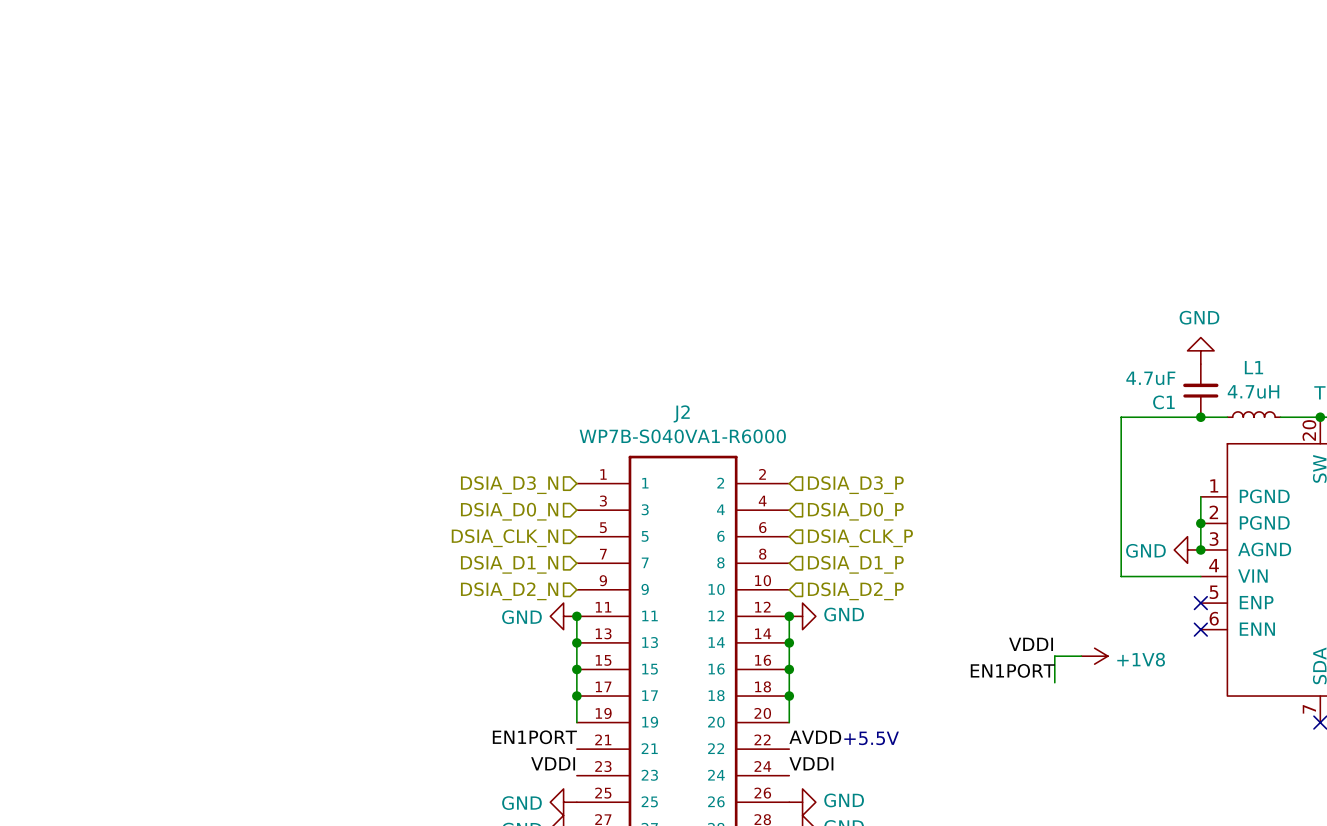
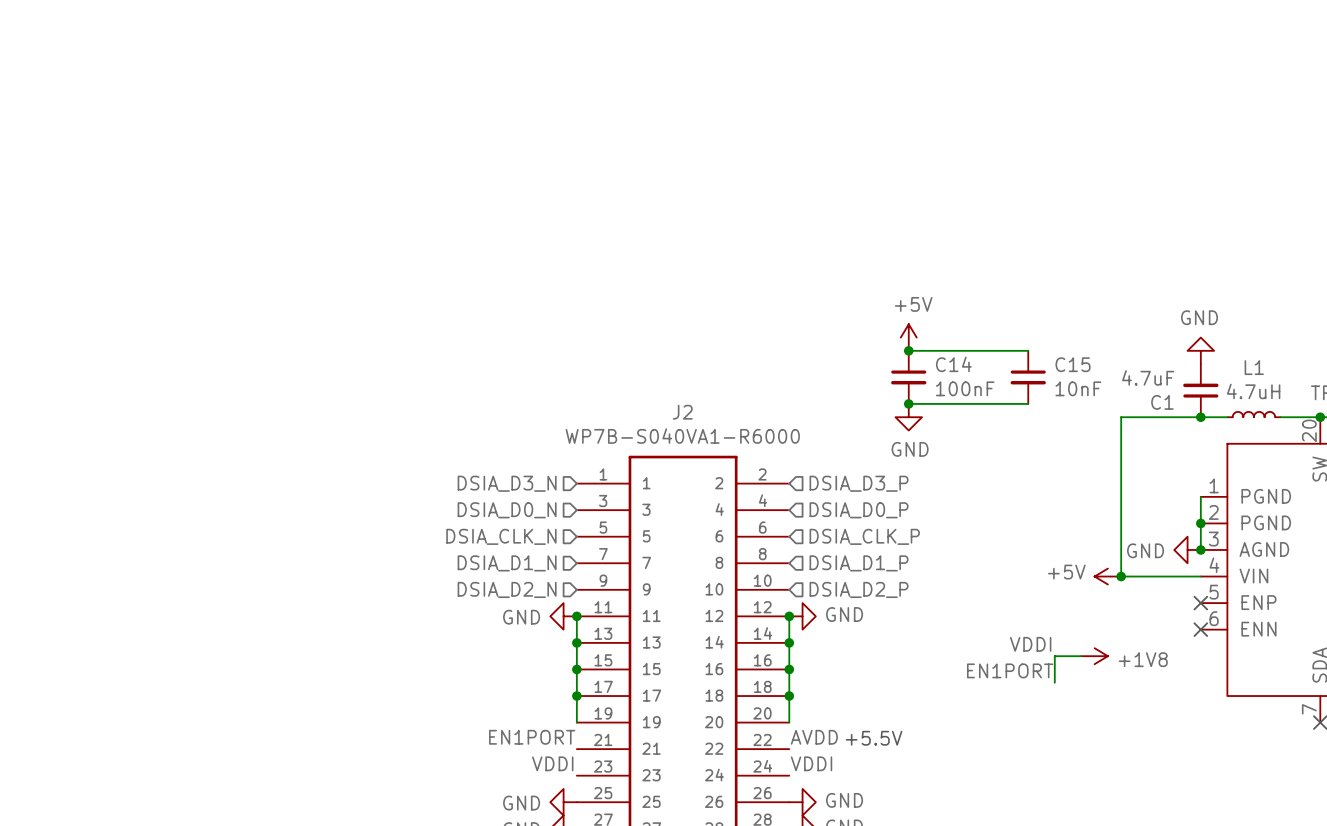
power symbol: none -> +5V (908, 337)
wire: none -> (908, 350) (1028, 350)
junction: none -> (908, 350)
C14: none -> 100nF (908, 377)
C15: none -> 10nF (1028, 377)
wire: none -> (908, 403) (1028, 403)
junction: none -> (908, 403)
power symbol: none -> GND (908, 417)
power symbol: none -> +5V (1107, 576)
junction: none -> (1121, 576)

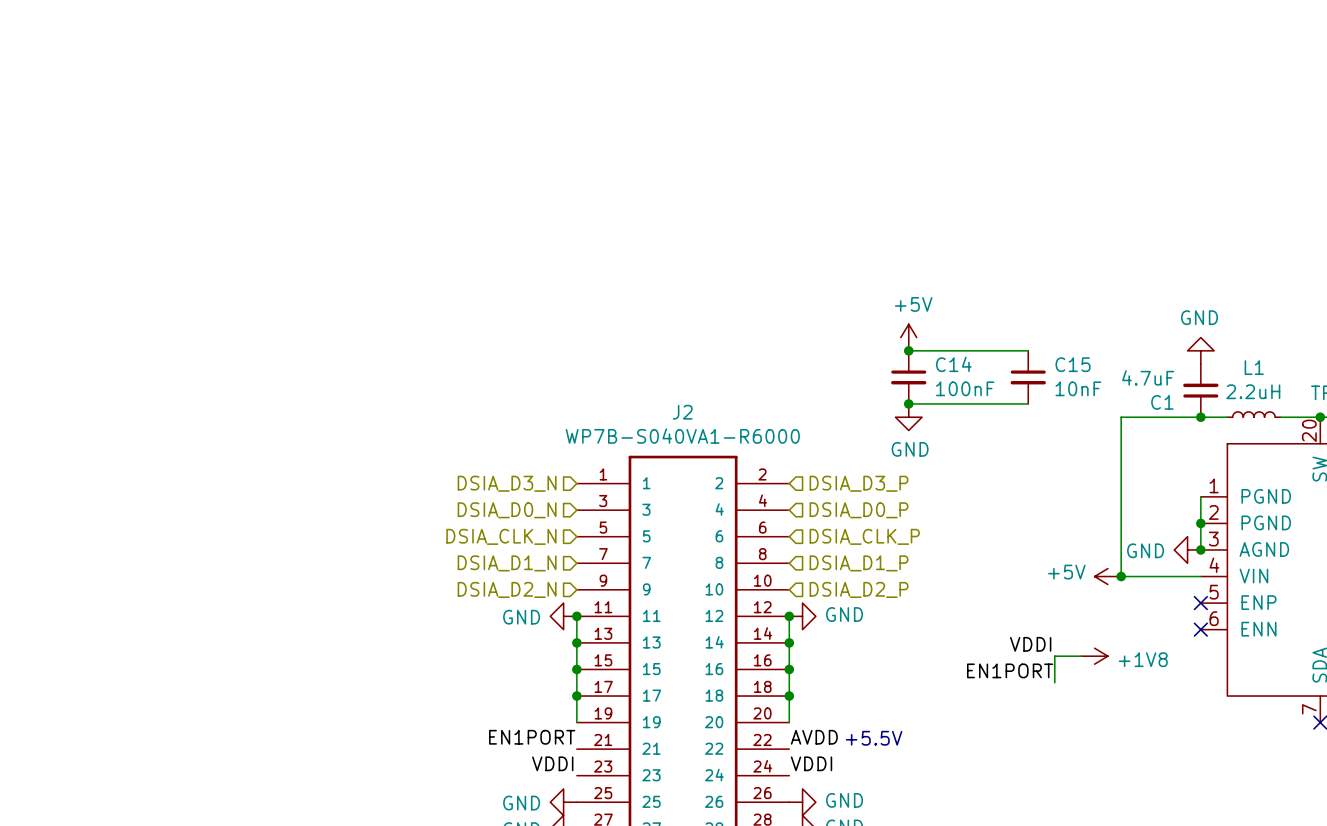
L1 value: 4.7uH (1253, 391) -> 2.2uH (1253, 391)

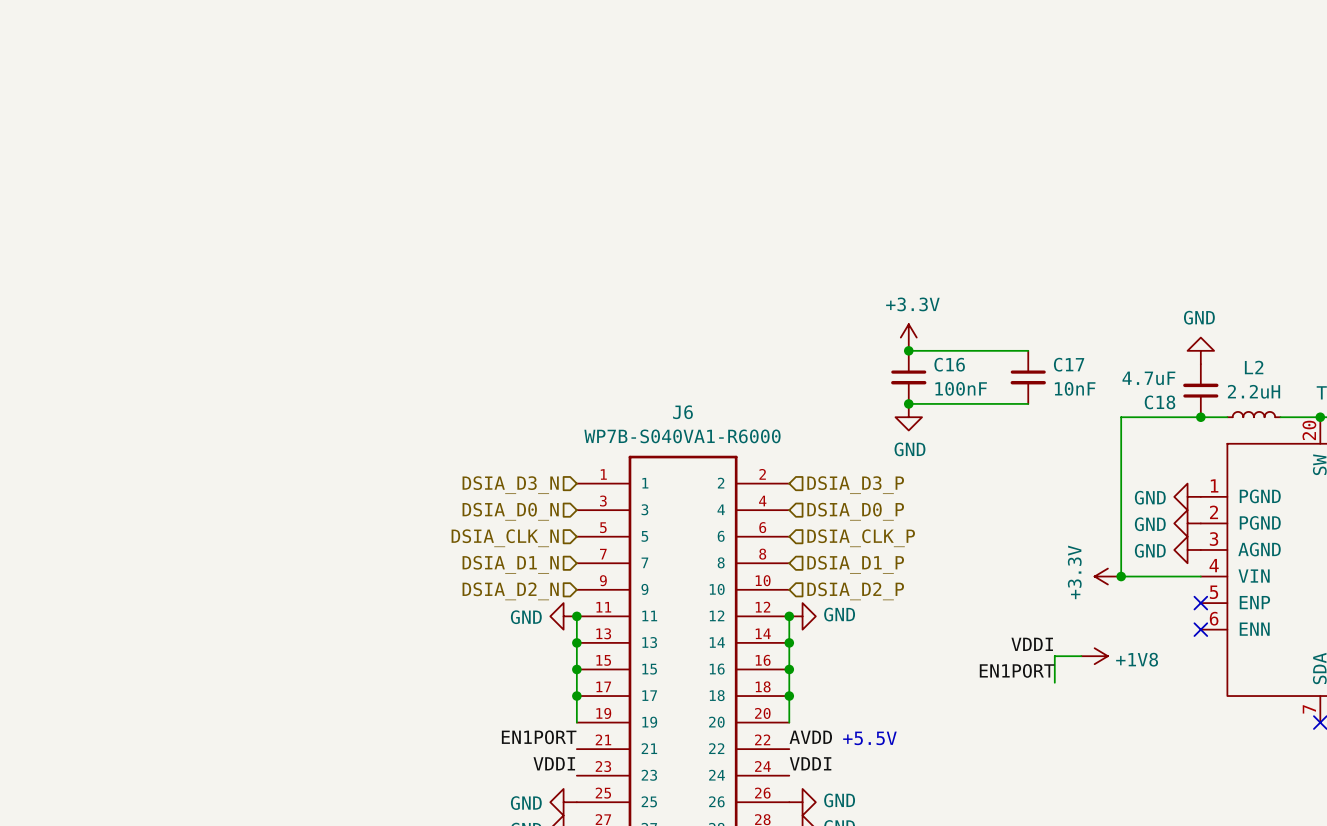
power symbol: +5V (908, 337) -> +3.3V (908, 337)
C14 name: C14 (953, 364) -> C16 (949, 364)
C15 name: C15 (1073, 364) -> C17 (1069, 364)
L1 name: L1 (1254, 367) -> L2 (1254, 367)
C1 name: C1 (1162, 402) -> C18 (1159, 402)
J2 name: J2 (682, 412) -> J6 (682, 412)
power symbol: none -> GND (1187, 496)
wire: (1200, 496) (1200, 549) -> none
power symbol: none -> GND (1187, 523)
junction: (1200, 523) -> none
junction: (1200, 549) -> none
power symbol: +5V (1107, 576) -> +3.3V (1107, 576)

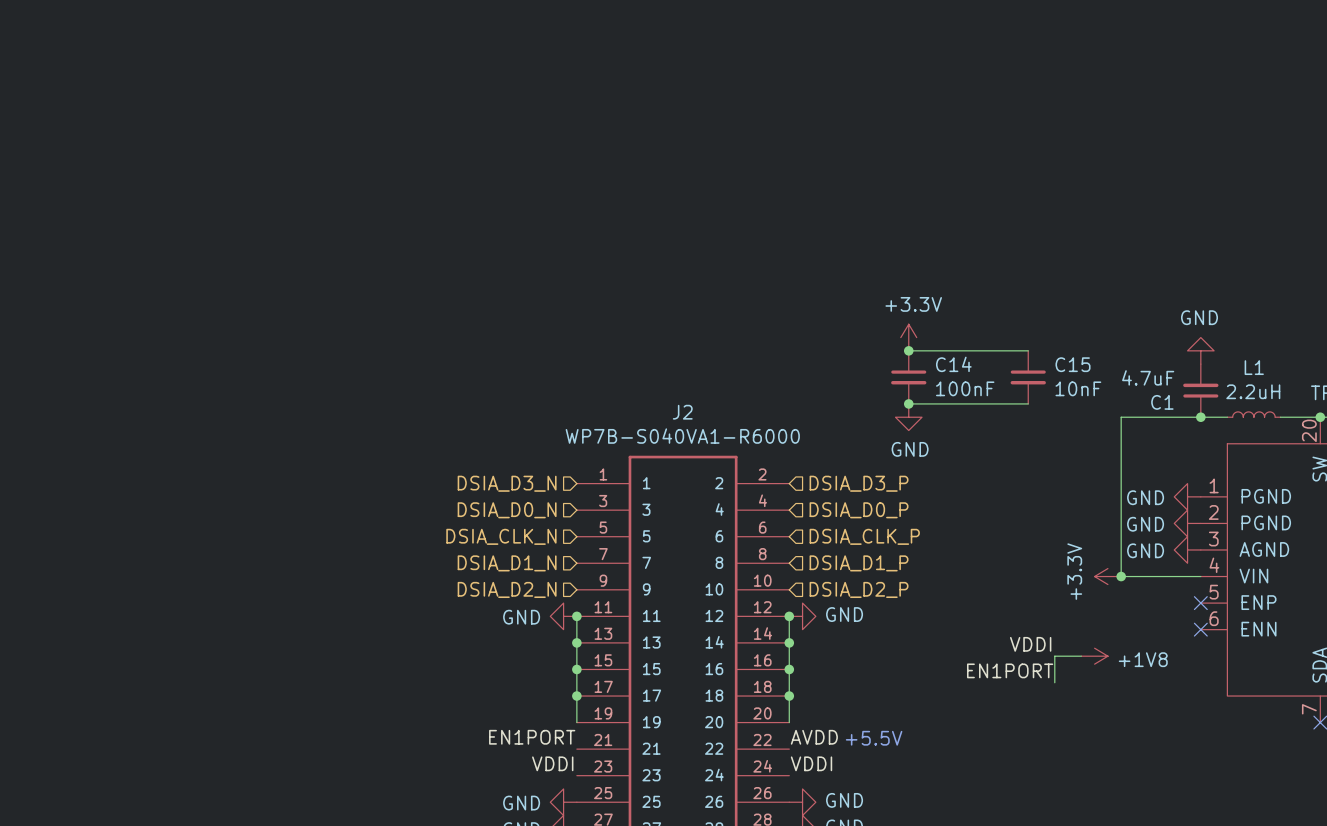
C16 name: C16 (949, 364) -> C14 (953, 364)
C17 name: C17 (1069, 364) -> C15 (1073, 364)
L2 name: L2 (1254, 367) -> L1 (1254, 367)
C18 name: C18 (1159, 402) -> C1 (1162, 402)
J6 name: J6 (682, 412) -> J2 (682, 412)

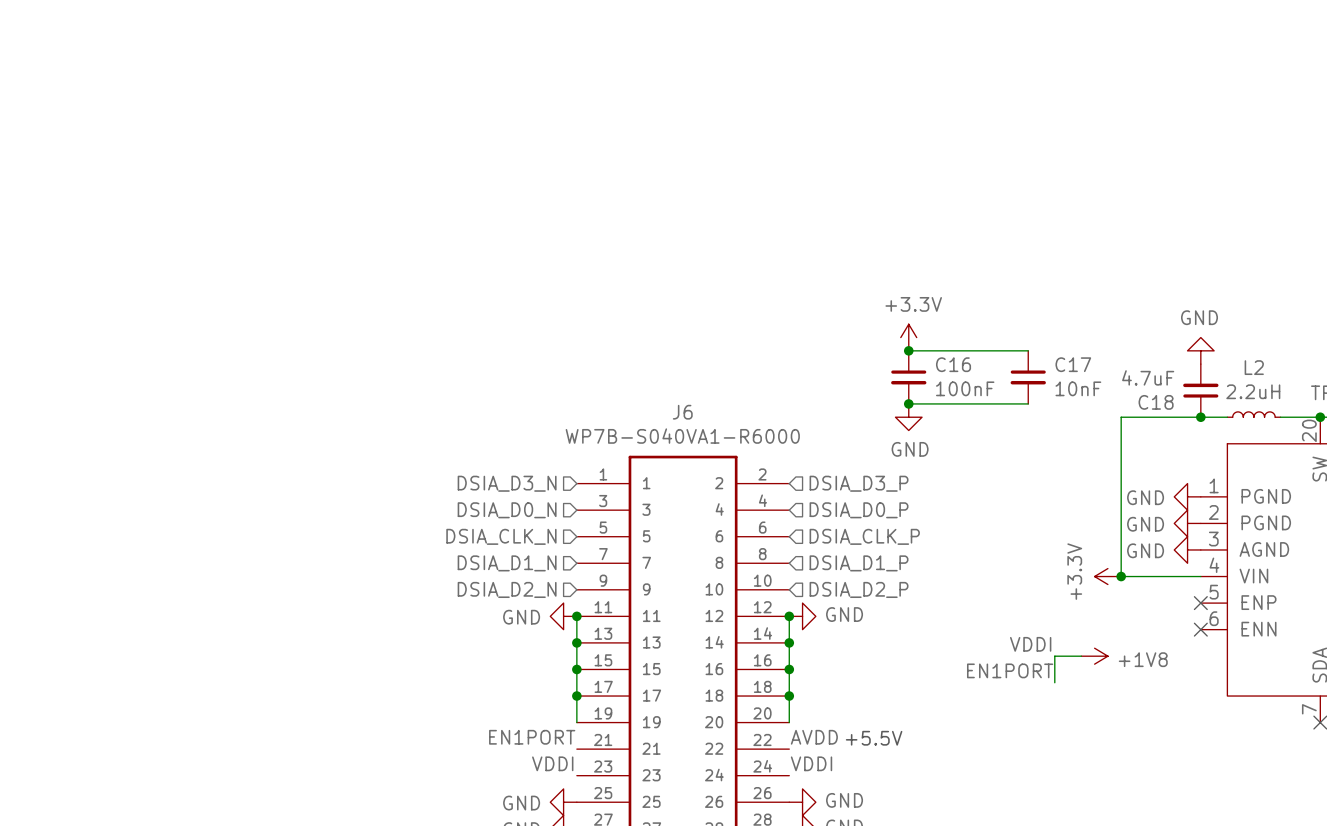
C14 name: C14 (953, 364) -> C16 (953, 364)
C15 name: C15 (1073, 364) -> C17 (1073, 364)
L1 name: L1 (1254, 367) -> L2 (1254, 367)
C1 name: C1 (1162, 402) -> C18 (1156, 402)
J2 name: J2 (682, 412) -> J6 (682, 412)

